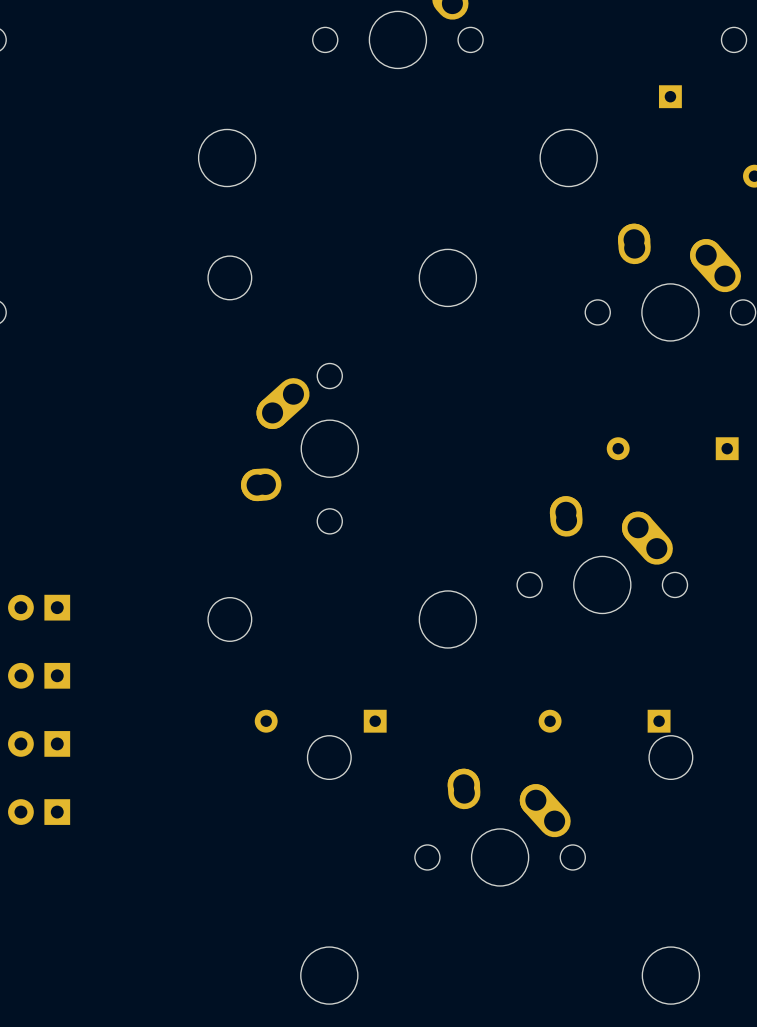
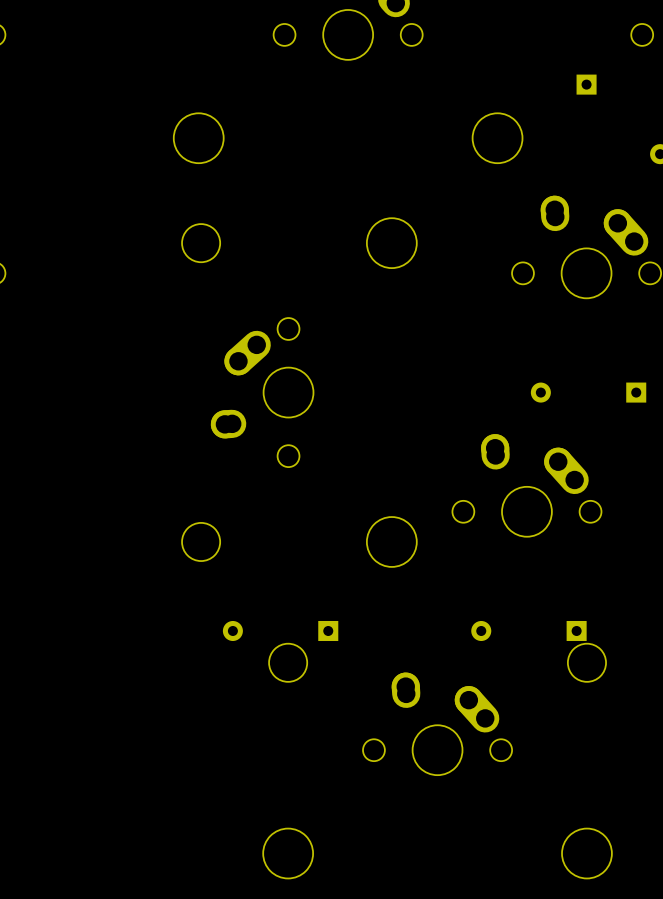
part: (39, 607) -> none
part: (39, 675) -> none
part: (39, 743) -> none
part: (39, 812) -> none

